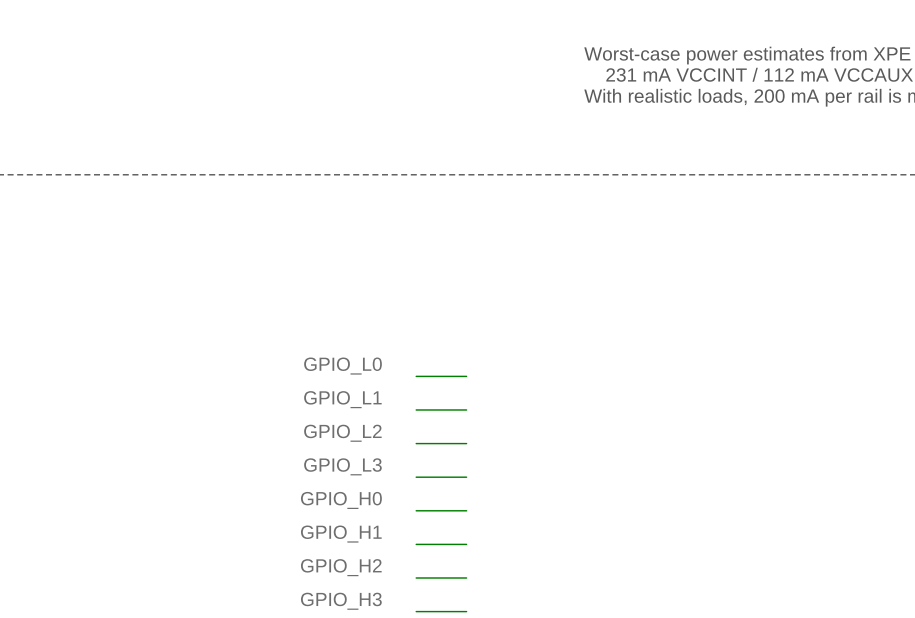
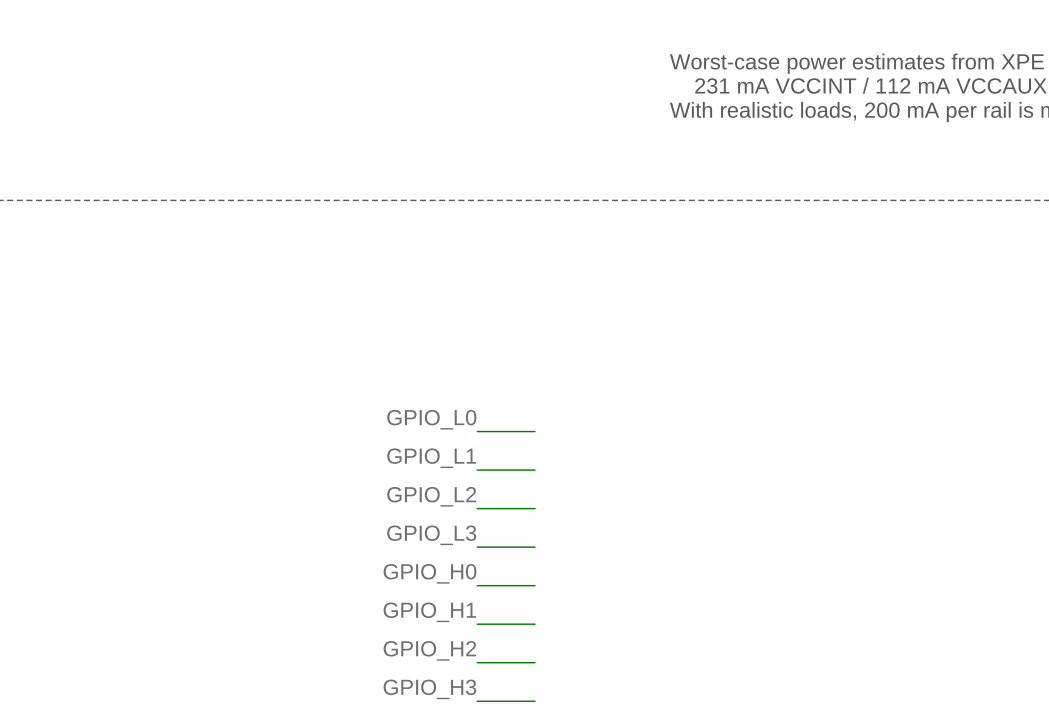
label position: GPIO_L0 (342, 366) -> GPIO_L0 (431, 419)
label position: GPIO_L1 (342, 399) -> GPIO_L1 (431, 458)
label position: GPIO_L2 (342, 433) -> GPIO_L2 (431, 496)
label position: GPIO_L3 (342, 466) -> GPIO_L3 (431, 535)
label position: GPIO_H0 (341, 500) -> GPIO_H0 (429, 573)
label position: GPIO_H1 (341, 534) -> GPIO_H1 (429, 612)
label position: GPIO_H2 (341, 567) -> GPIO_H2 (429, 650)
label position: GPIO_H3 (341, 601) -> GPIO_H3 (429, 689)

